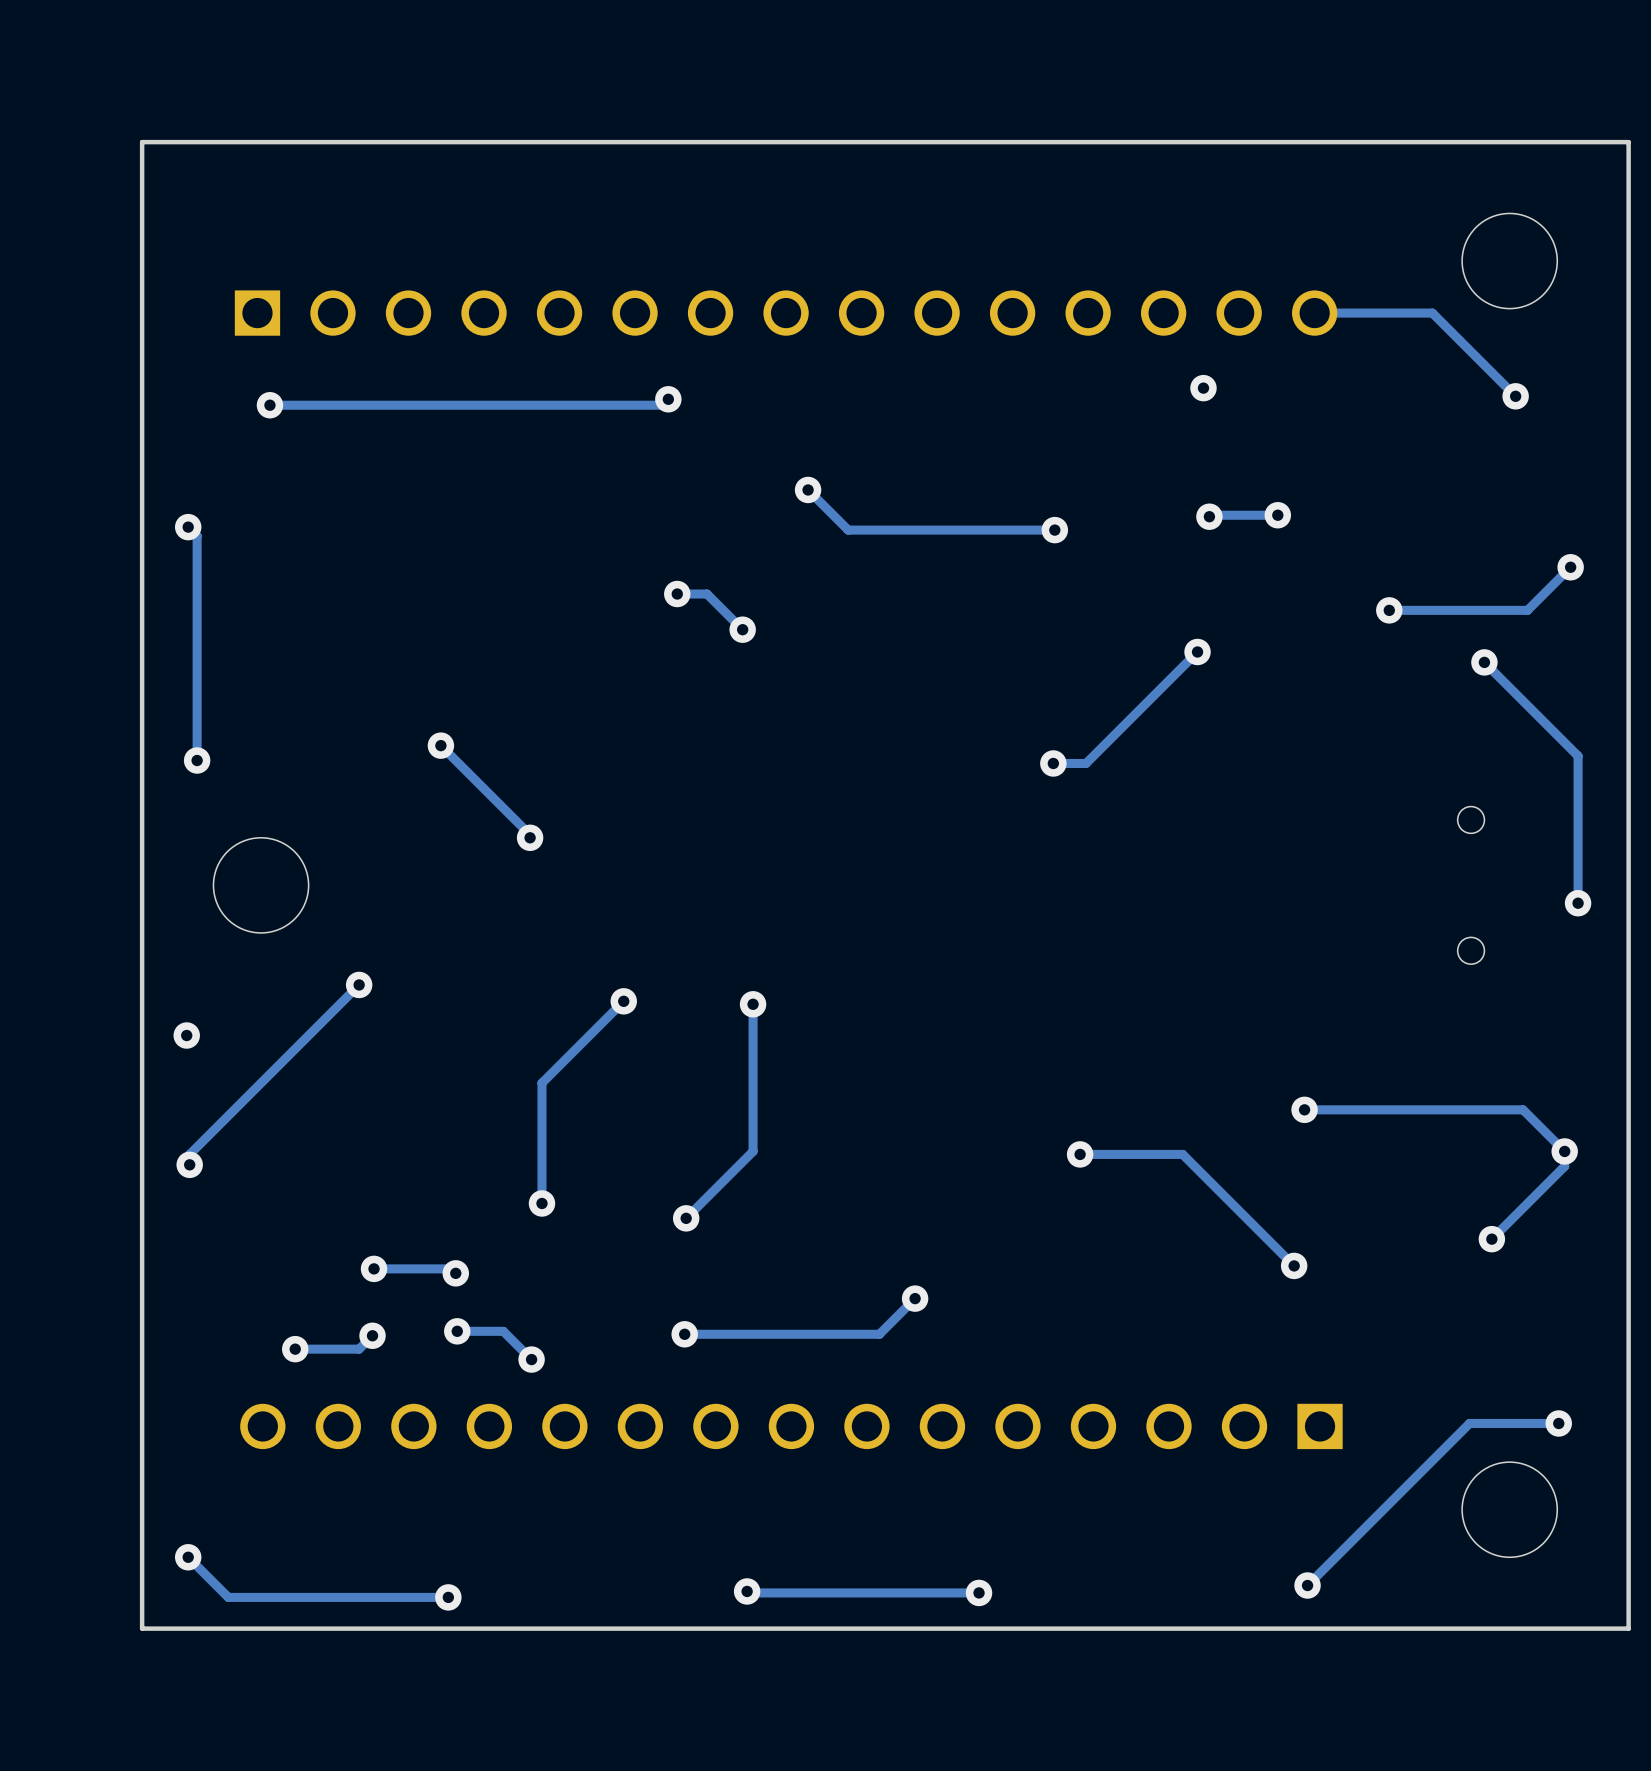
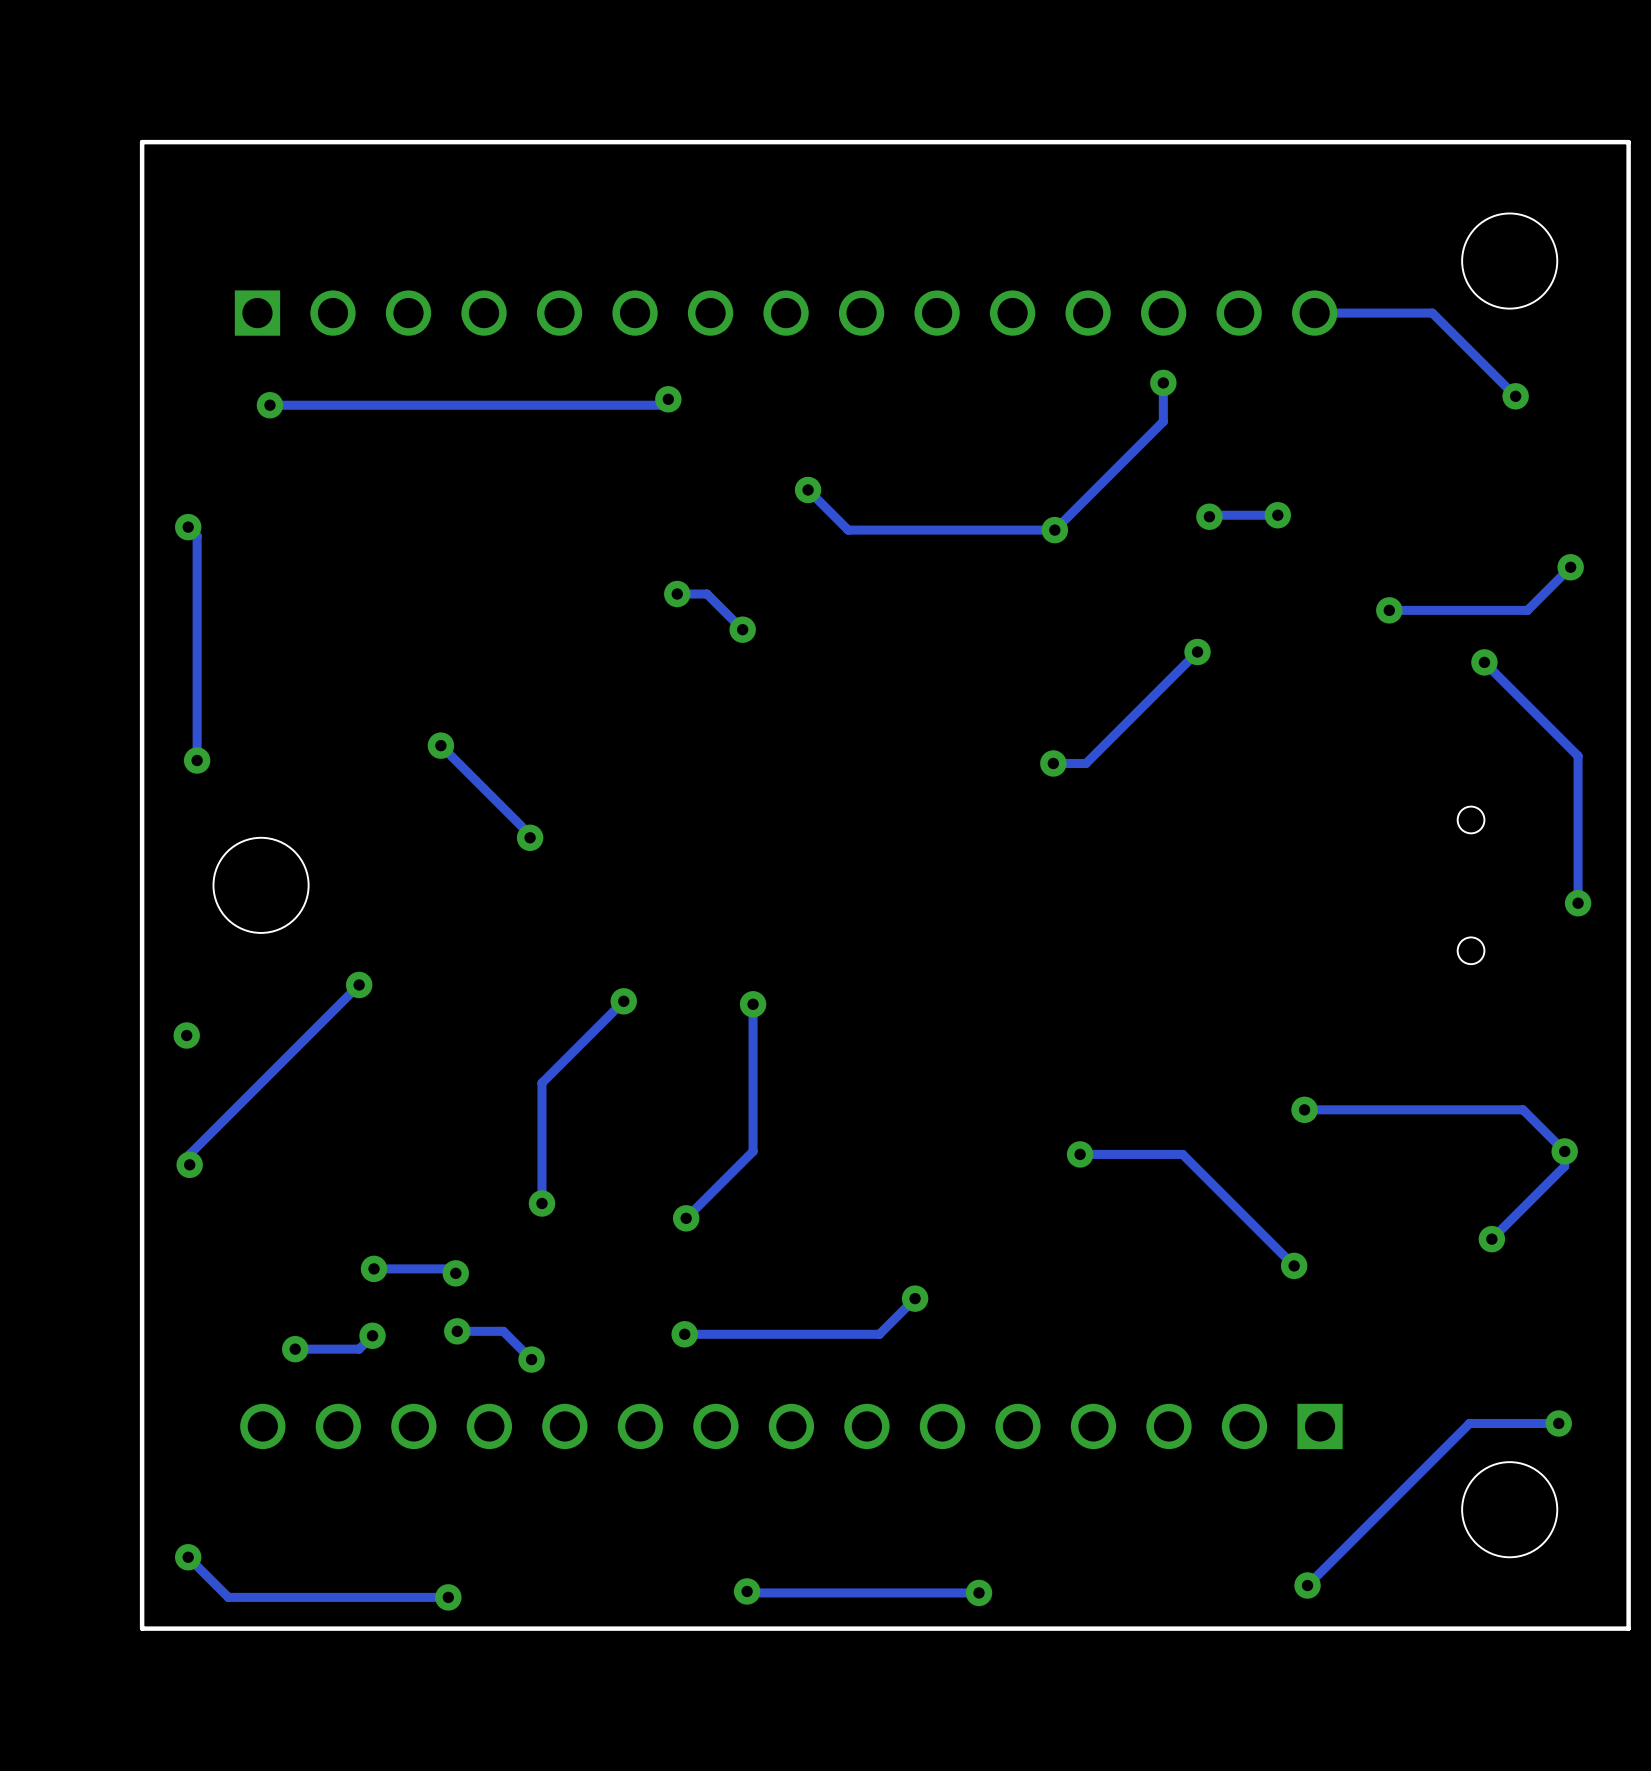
track: none -> (1163, 382) (1163, 421) (1054, 530)
via position: (1203, 388) -> (1163, 382)

